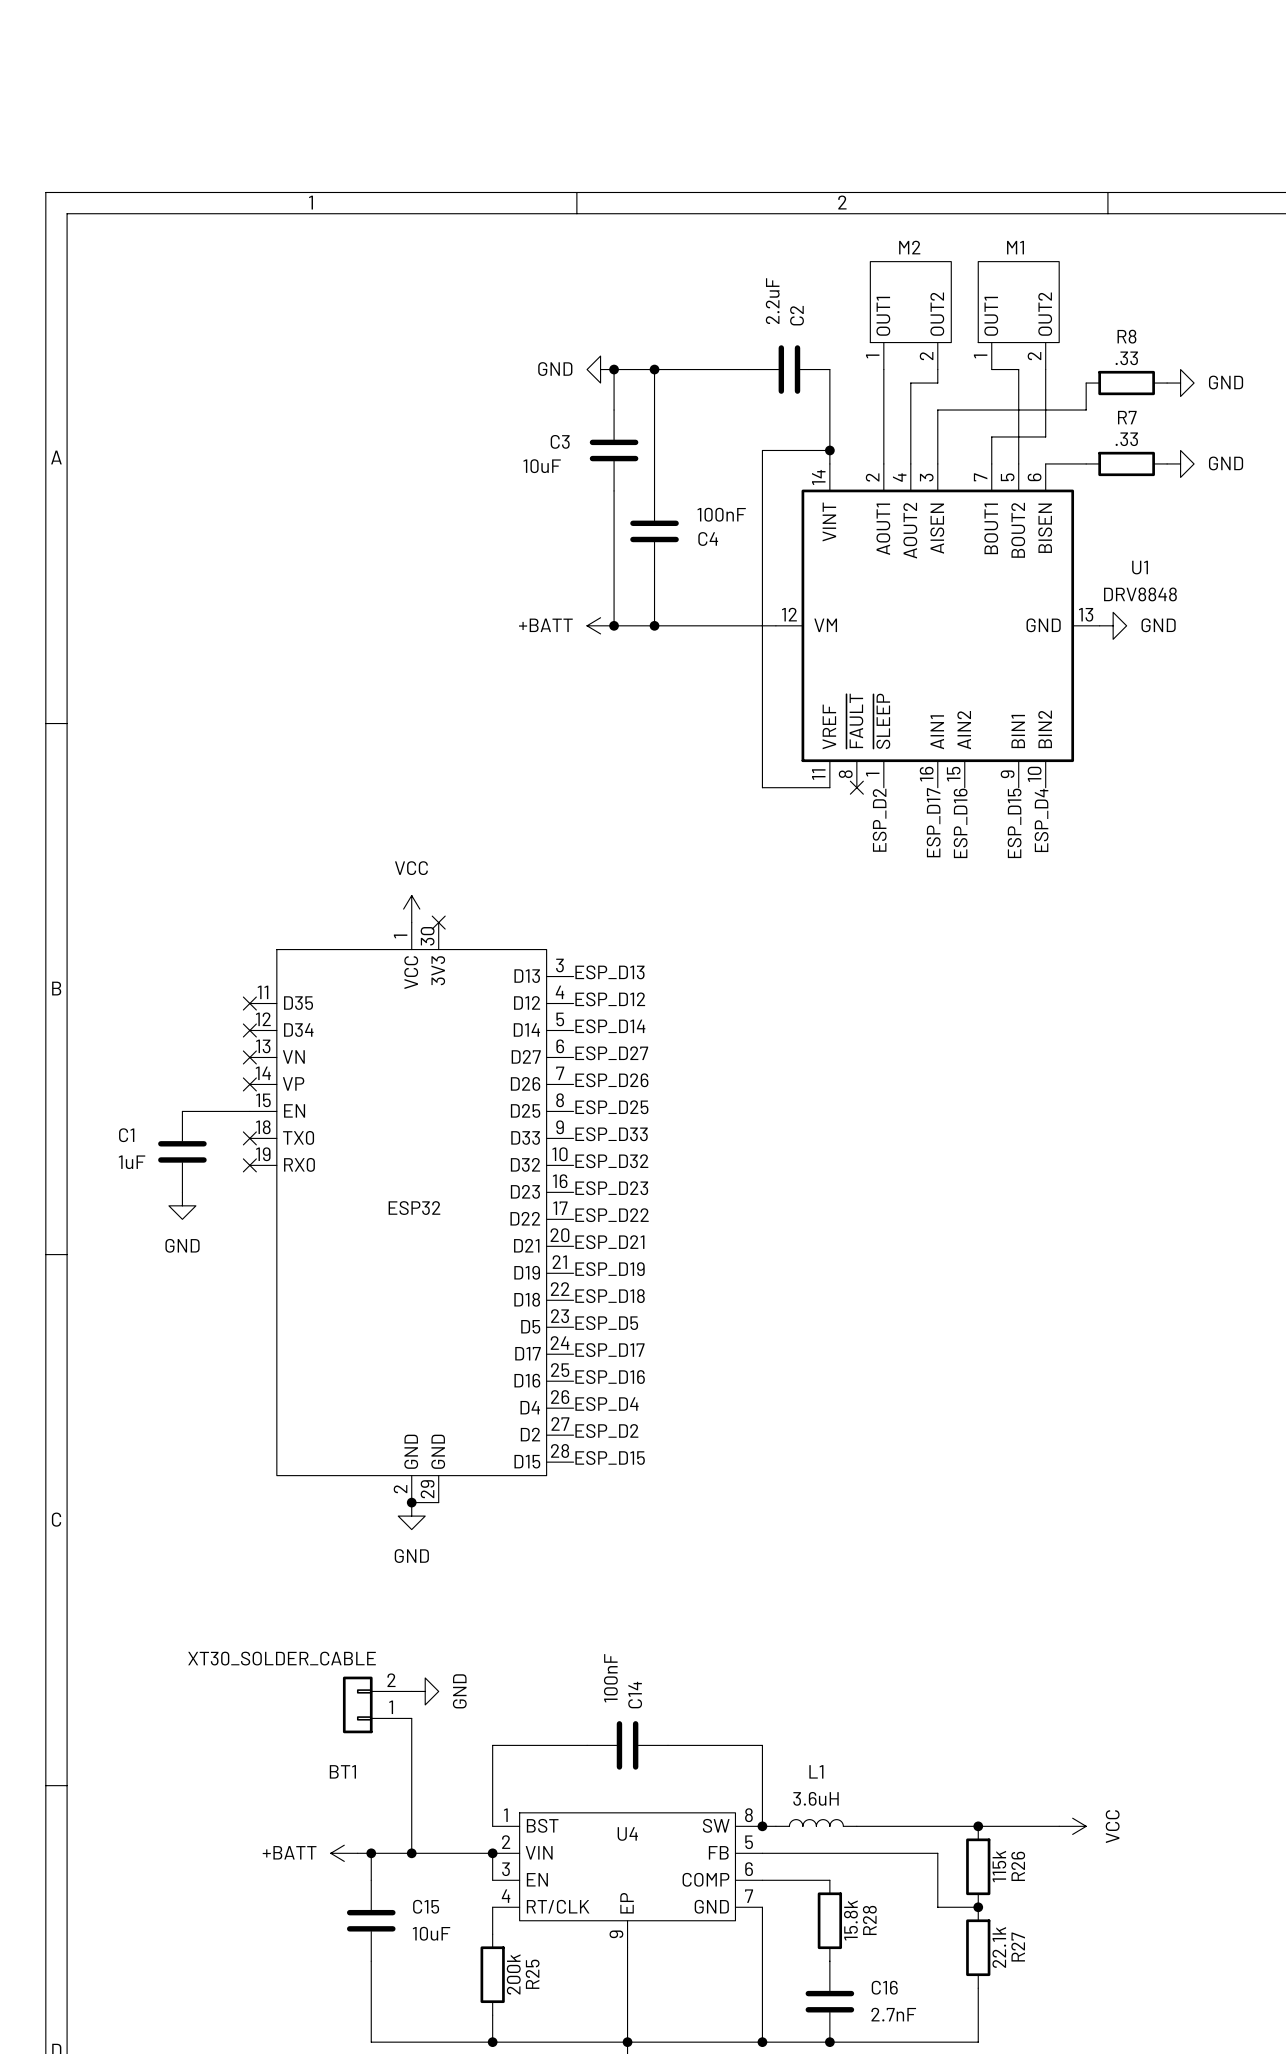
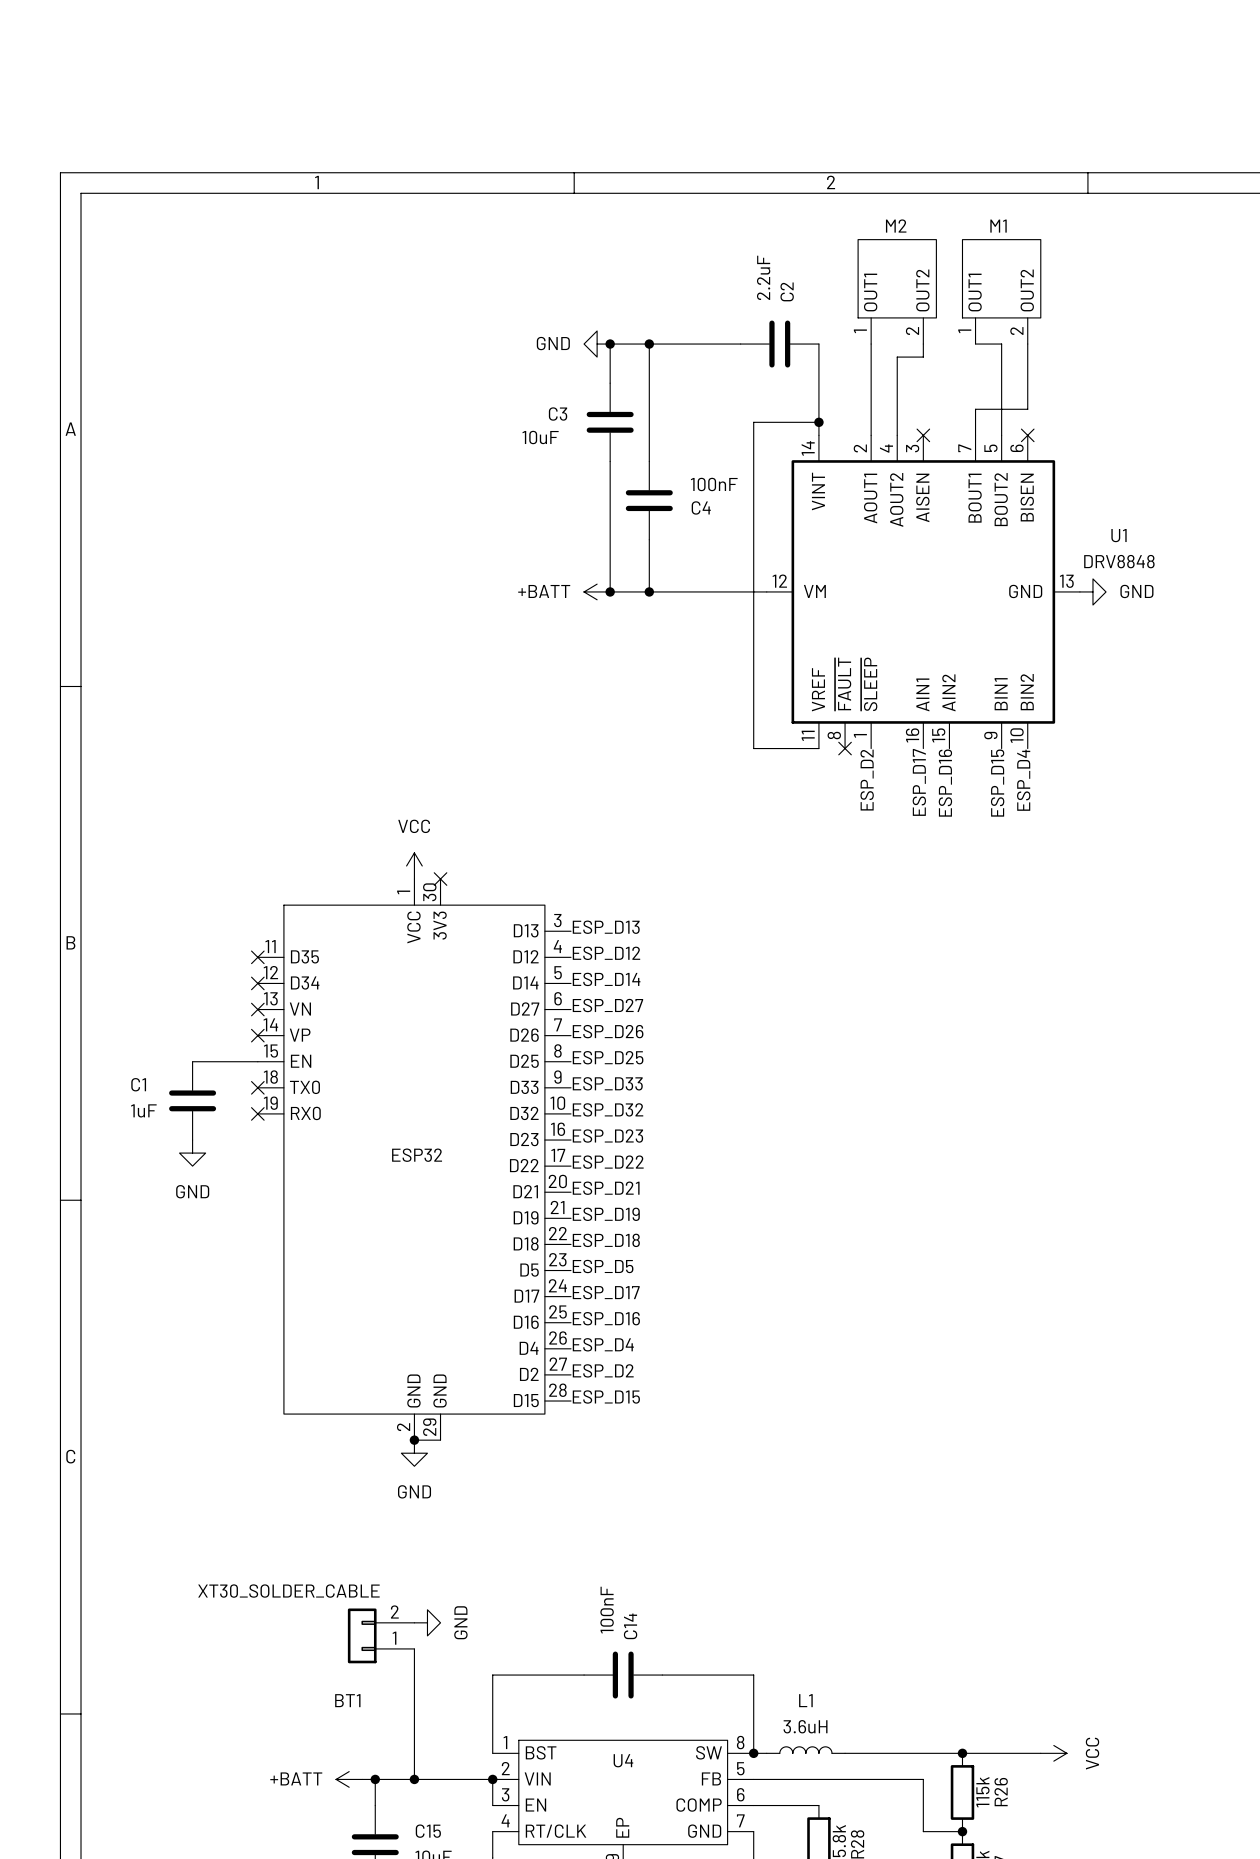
wire: (1086, 383) (1086, 410) (937, 410) (937, 463) -> none
R8: .33 (1126, 383) -> none
power symbol: GND (1180, 383) -> none
no-connect mark: none -> (923, 435)
wire: (1045, 463) (1086, 463) -> none
no-connect mark: none -> (1027, 435)
R7: .33 (1126, 463) -> none
power symbol: GND (1180, 463) -> none

